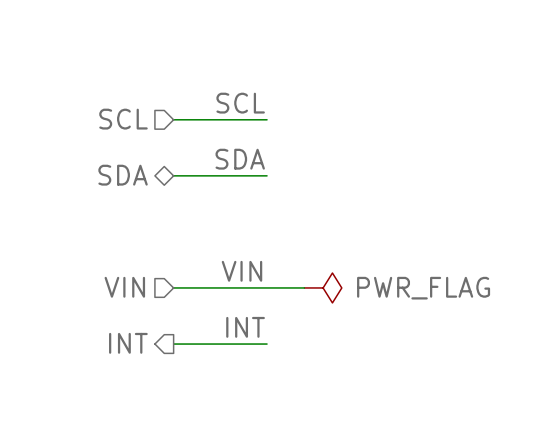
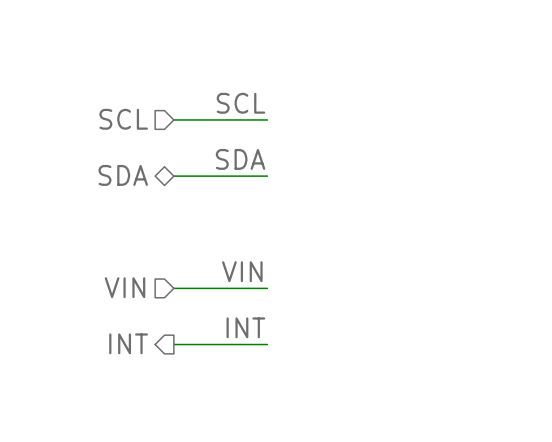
wire: (267, 287) (304, 287) -> none
power symbol: PWR_FLAG (323, 287) -> none

